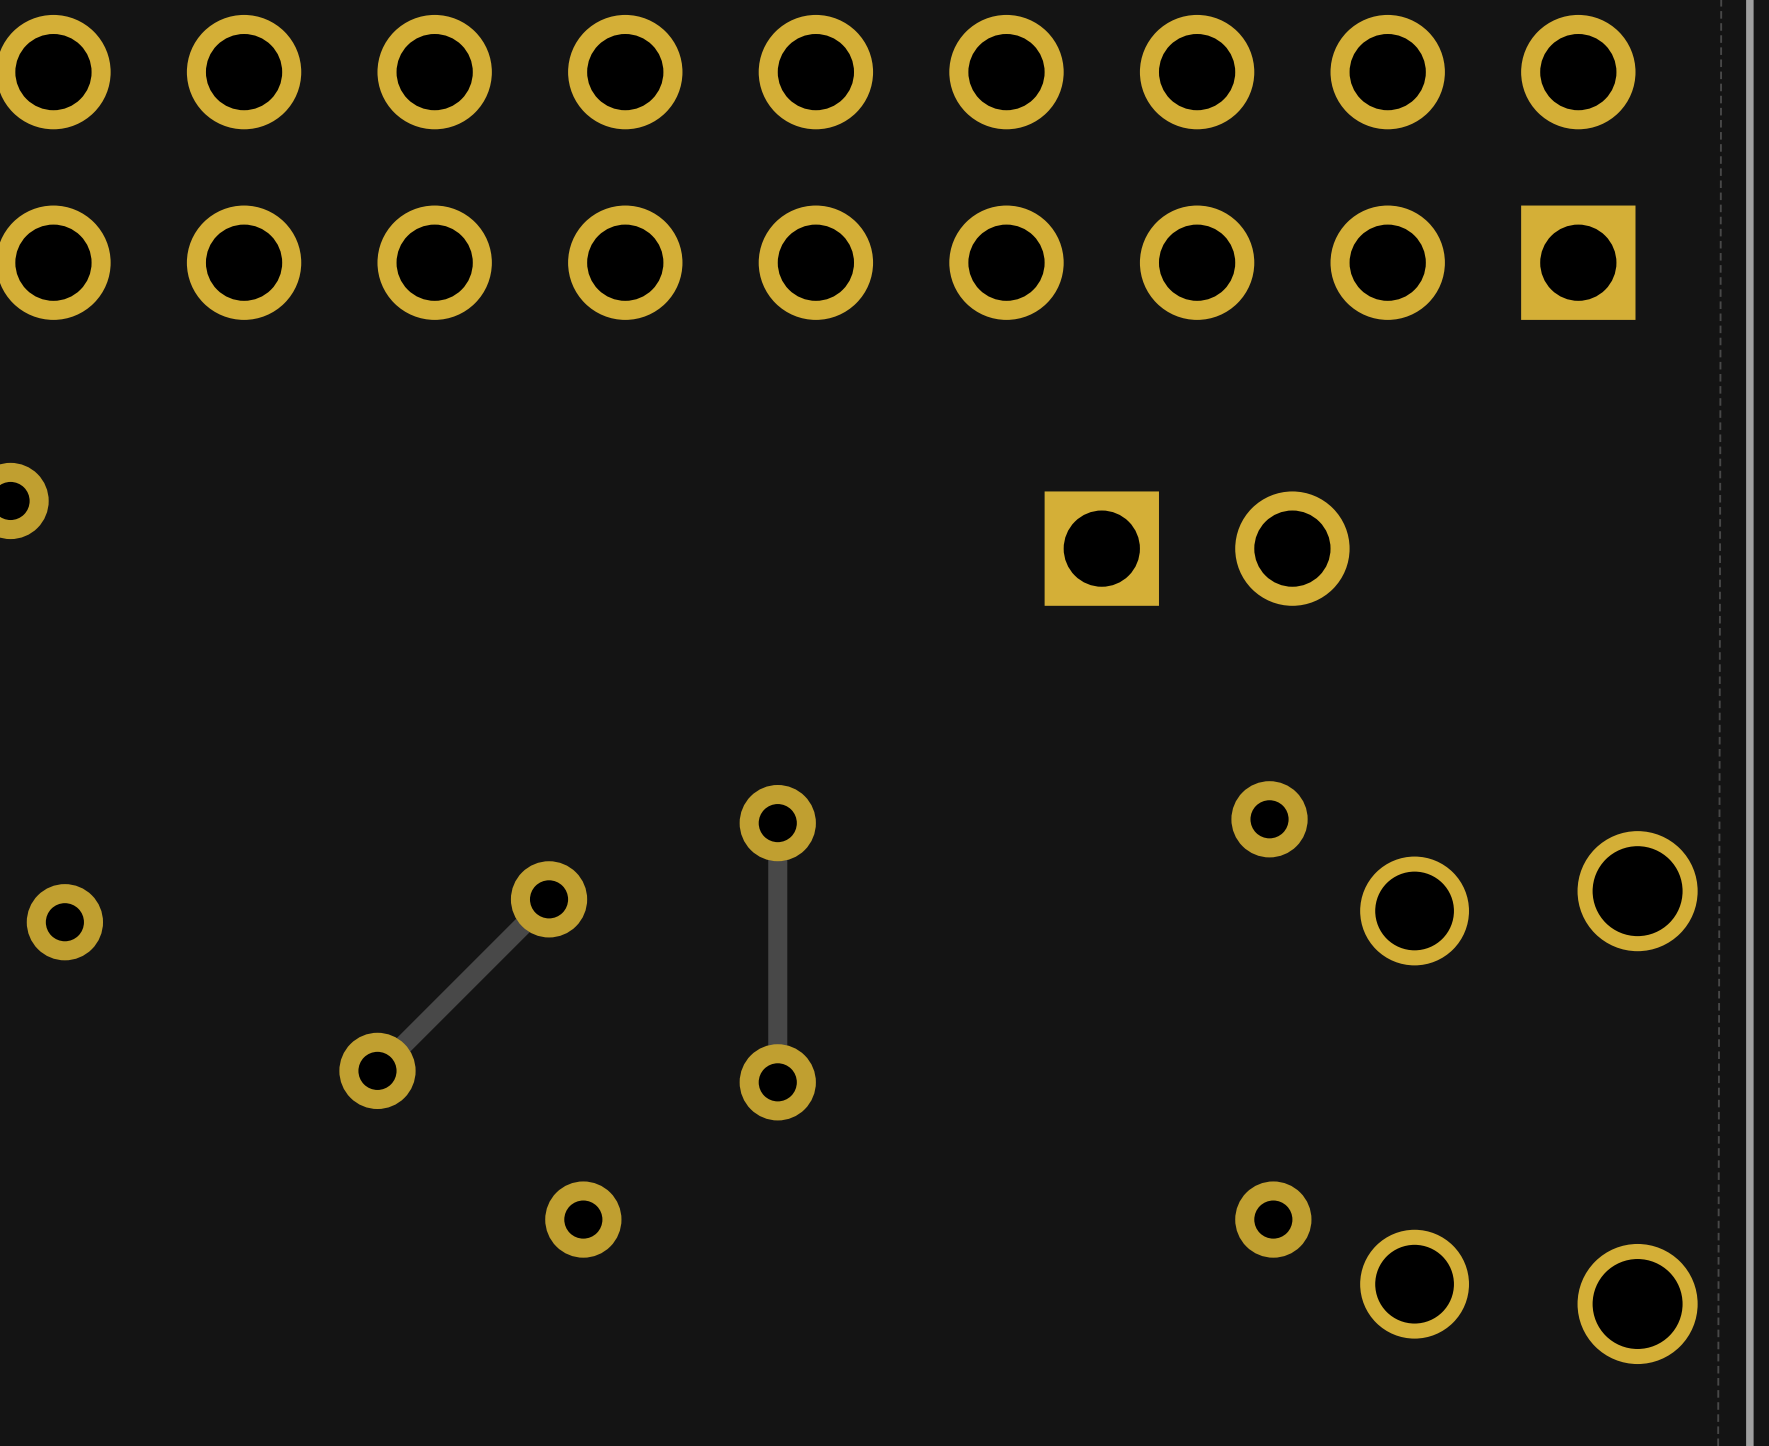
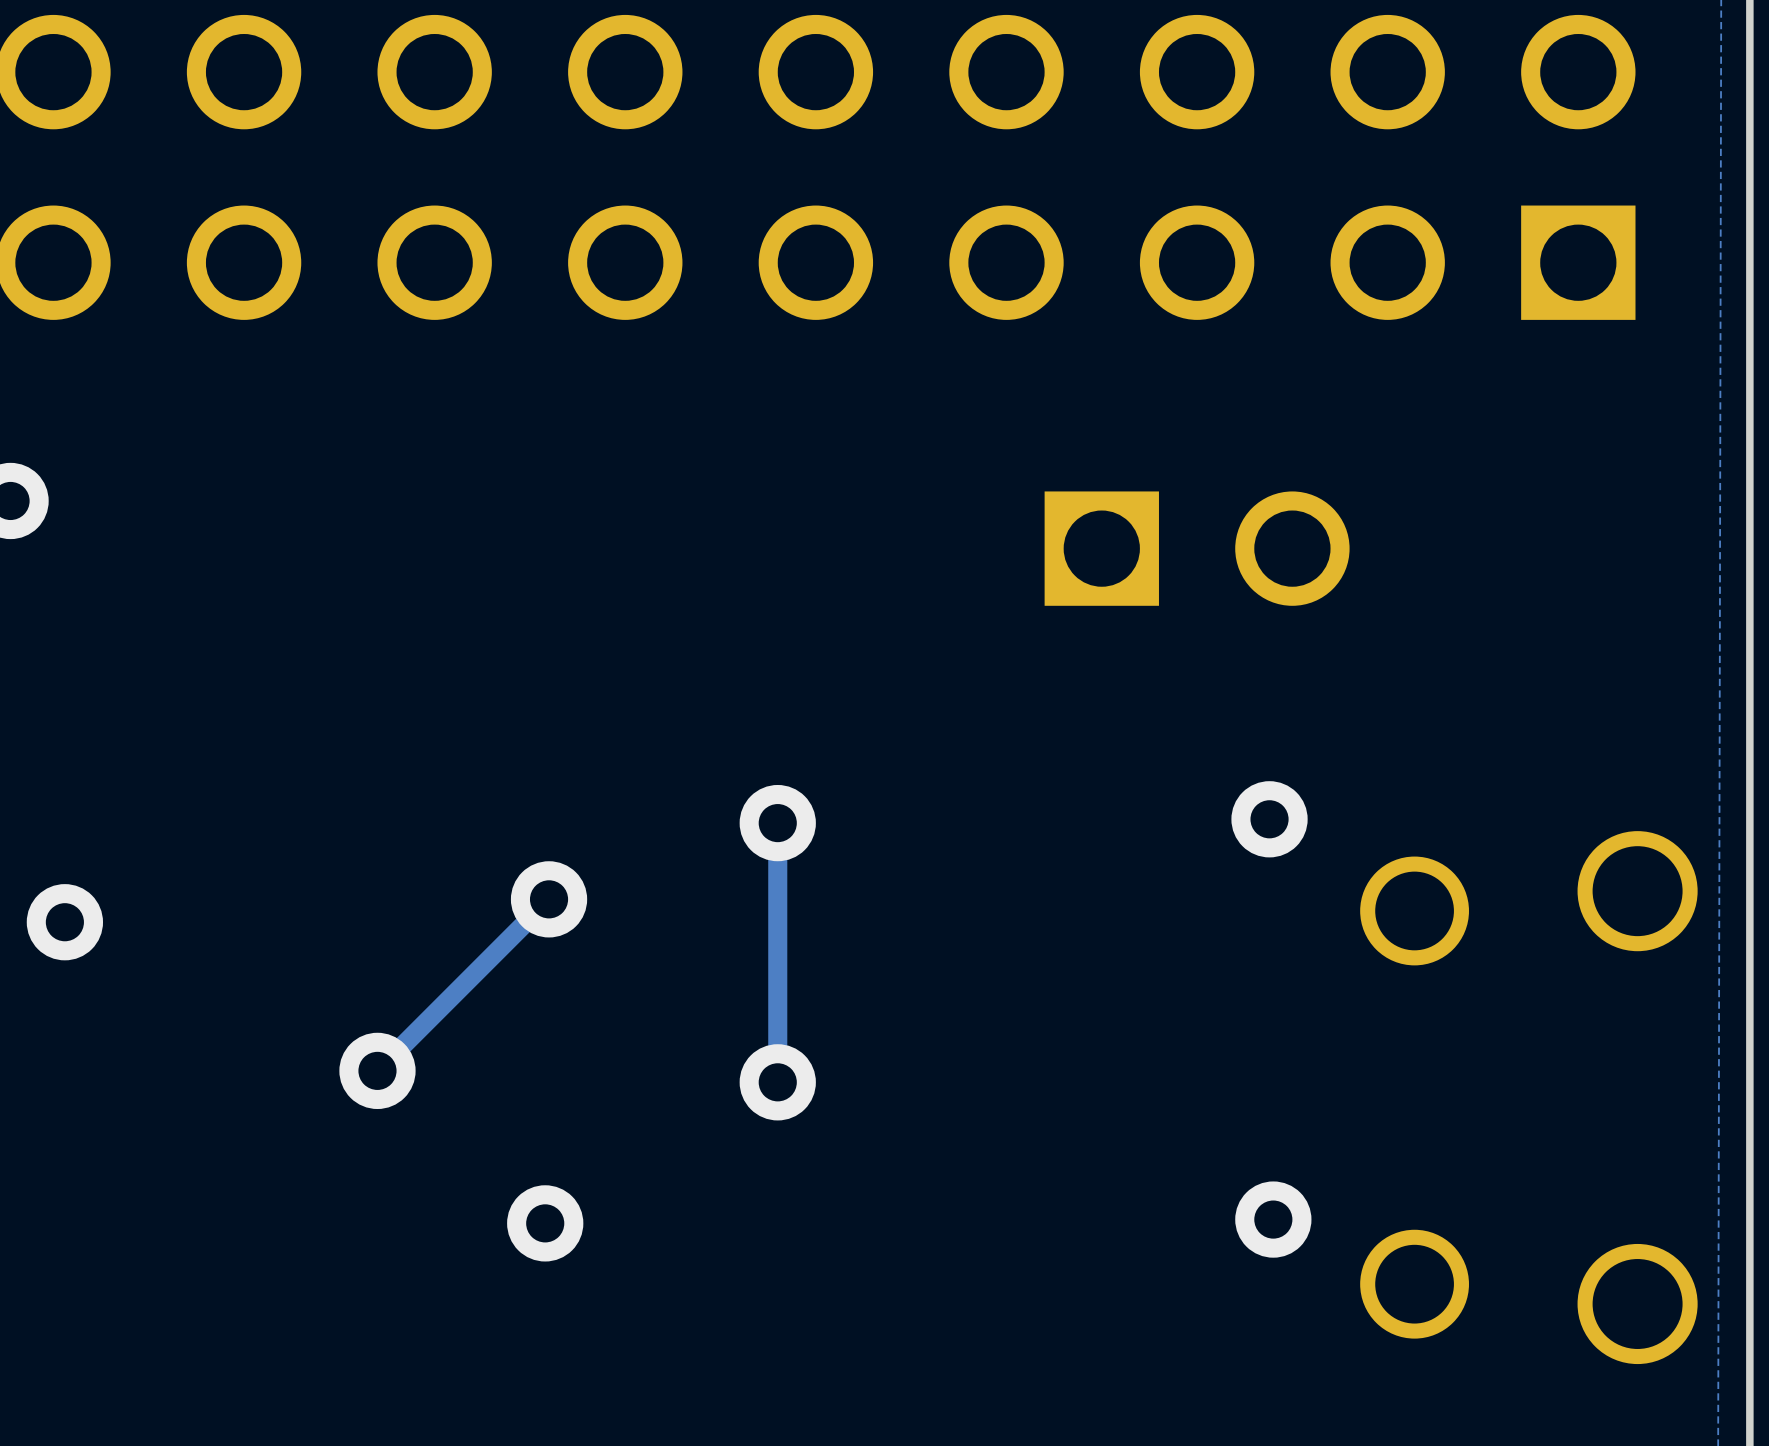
via position: (583, 1219) -> (545, 1223)

